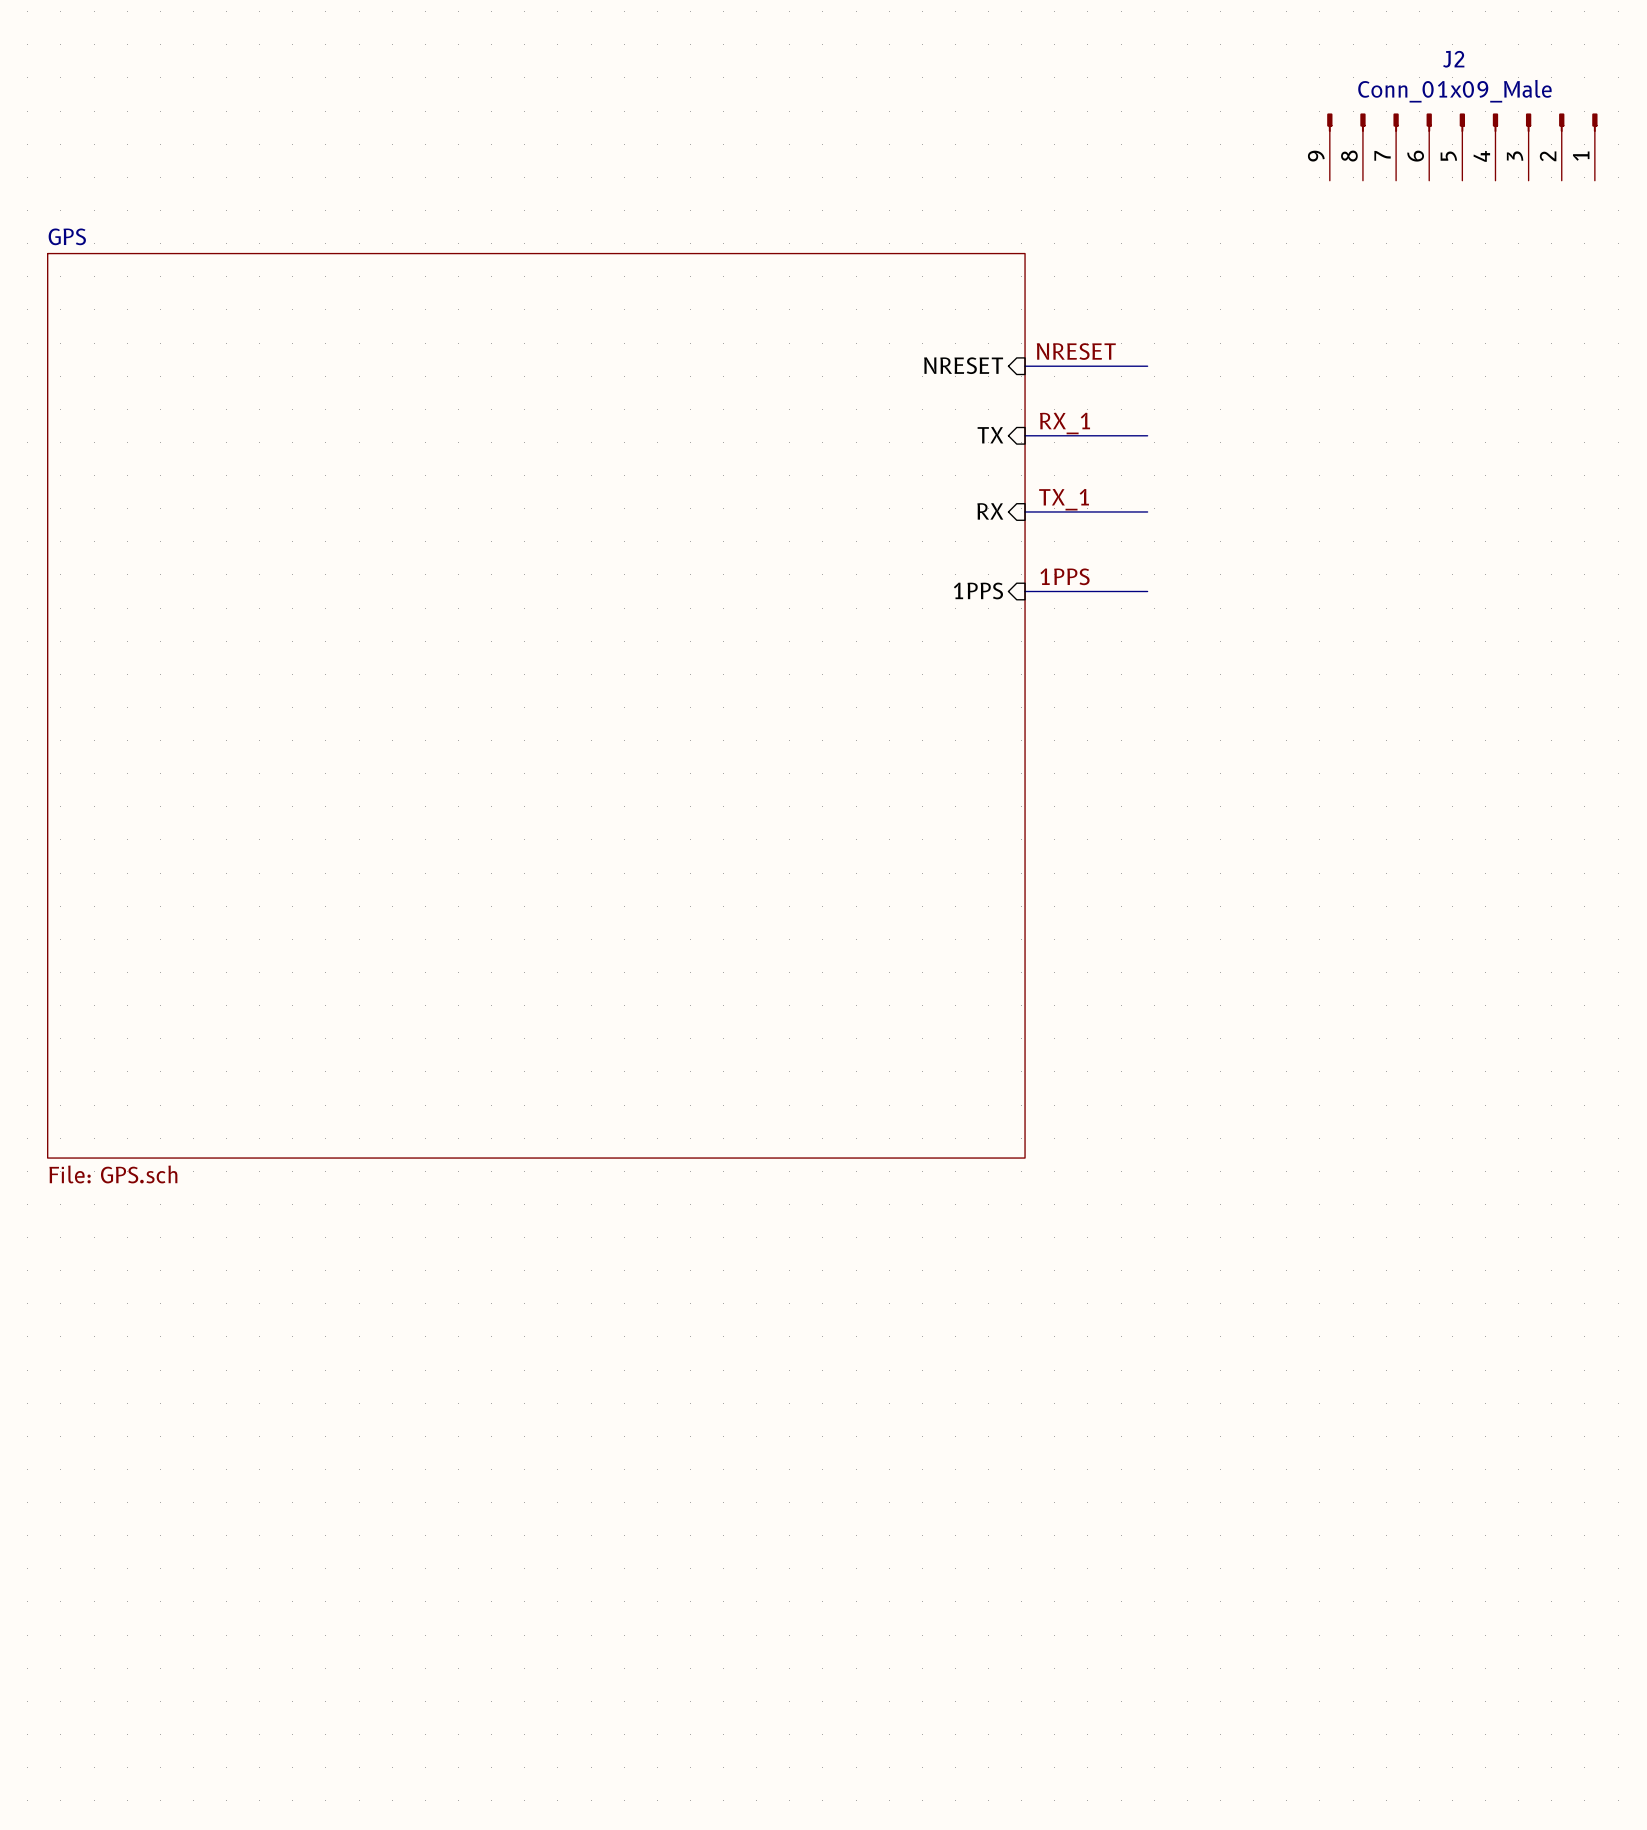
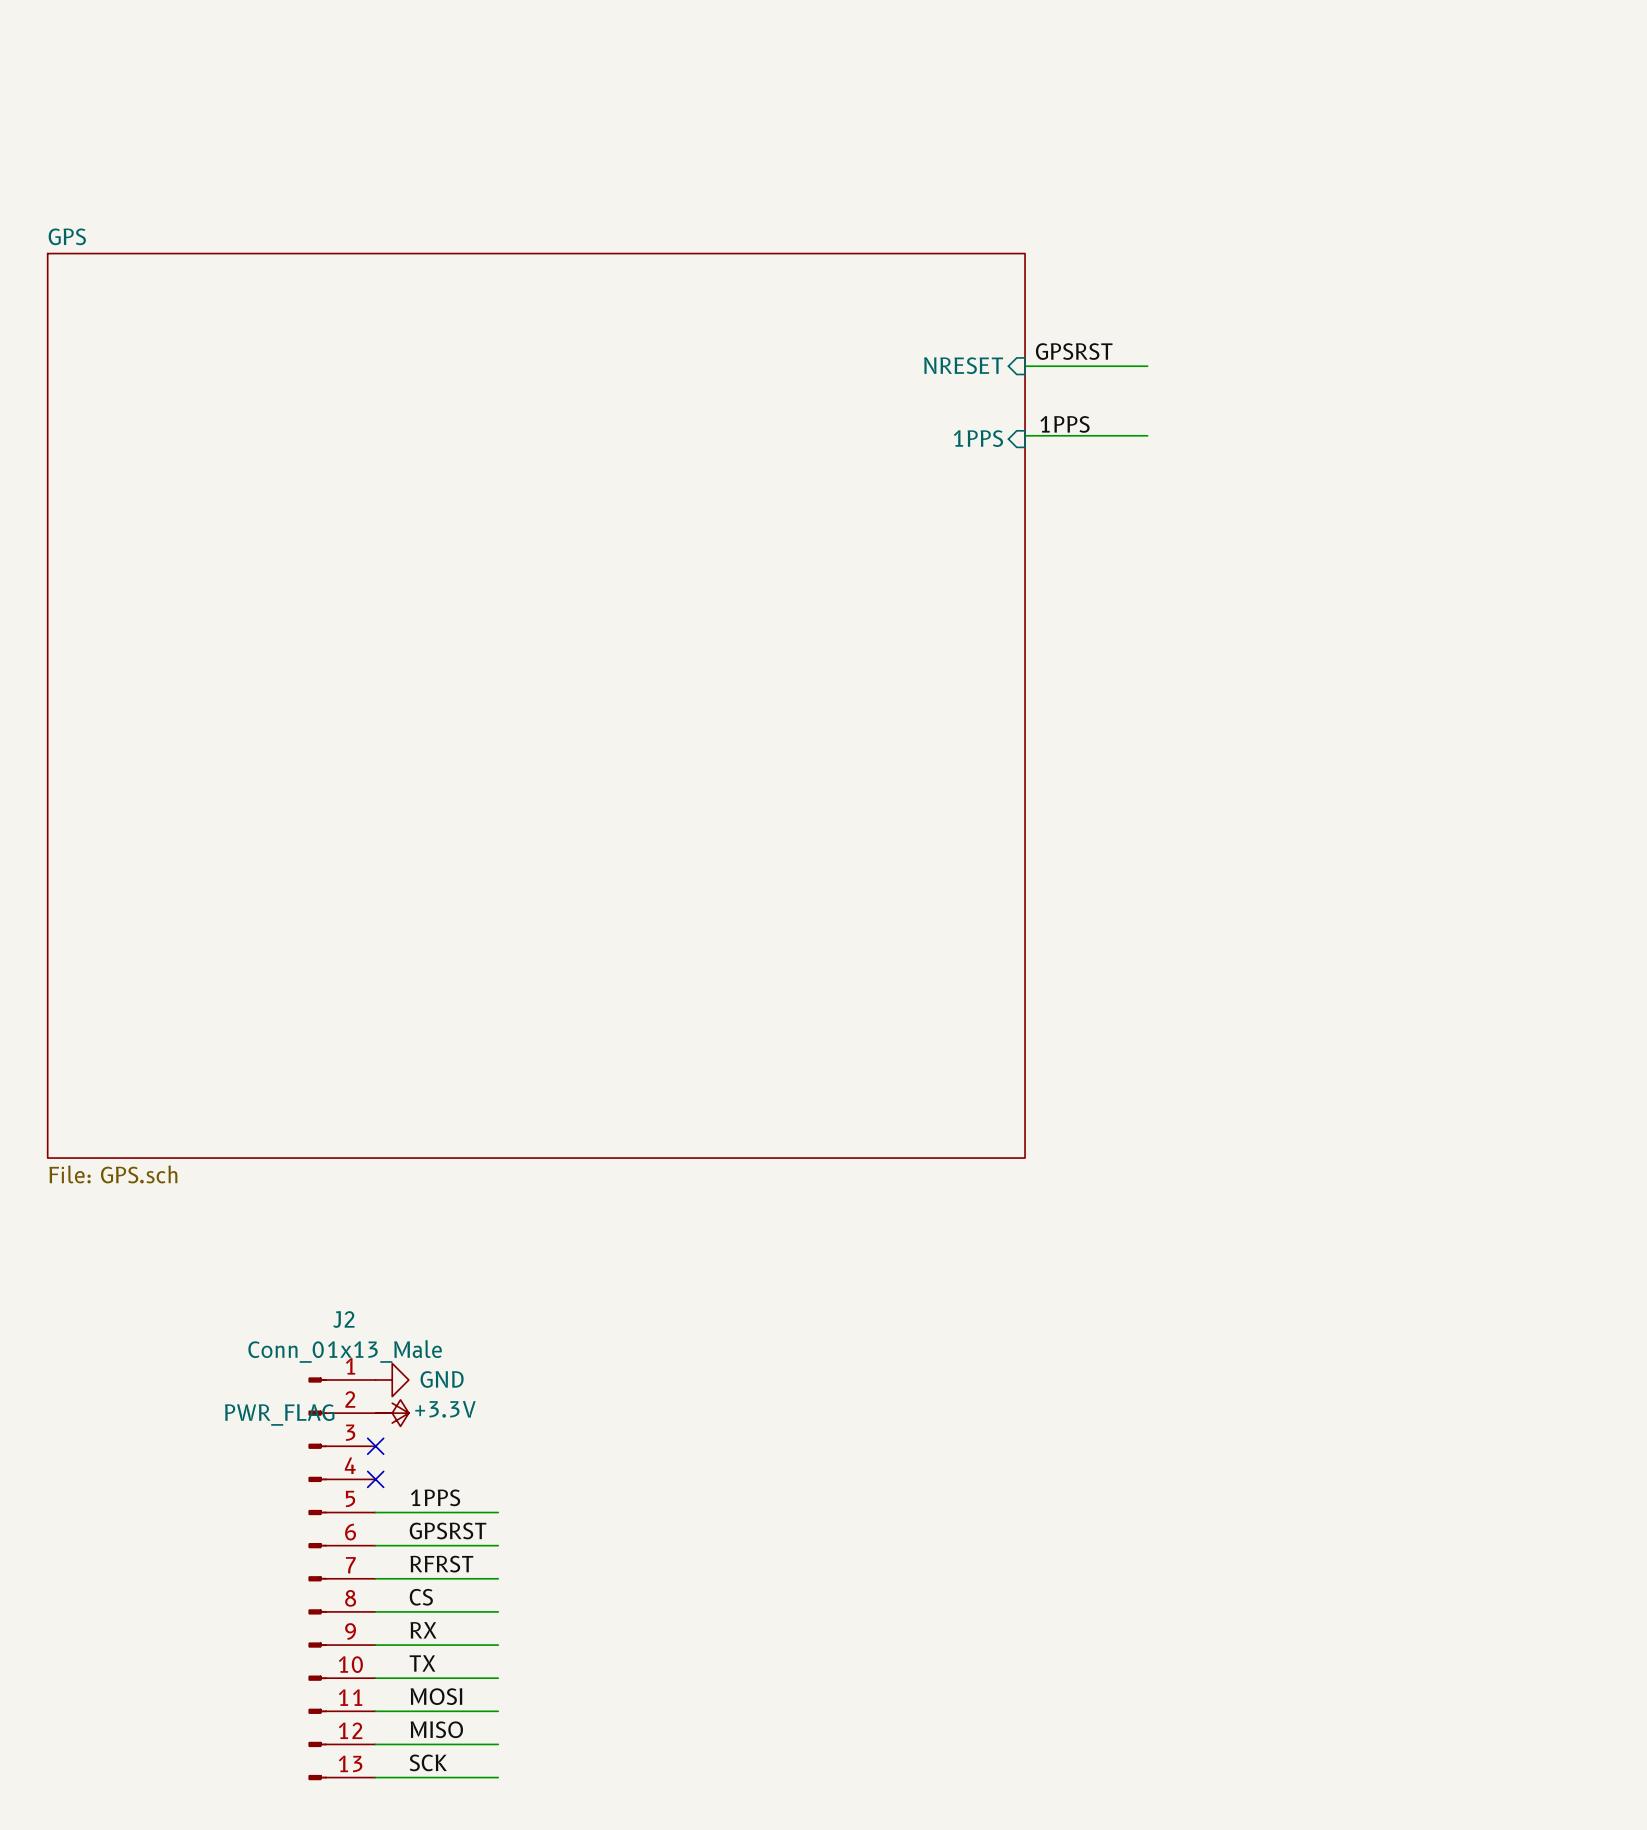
J2 name position: J2 (1453, 59) -> J2 (343, 1319)
J2 value: Conn_01x09_Male (1454, 91) -> Conn_01x13_Male (345, 1351)
J2 symbol: [1327, 113, 1598, 181] -> [308, 1377, 376, 1781]
label: NRESET (1076, 351) -> GPSRST (1074, 351)
label: RX_1 (1065, 423) -> none
sheet pin: TX (990, 435) -> none
label: TX_1 (1064, 499) -> none
sheet pin: RX (990, 511) -> none
wire: (1025, 511) (1147, 511) -> none
label position: 1PPS (1065, 576) -> 1PPS (1065, 424)
sheet pin position: 1PPS (978, 590) -> 1PPS (978, 438)
wire: (1025, 591) (1147, 591) -> none
power symbol: none -> GND (392, 1380)
power symbol: none -> +3.3V (392, 1413)
power symbol: none -> PWR_FLAG (392, 1413)
no-connect mark: none -> (375, 1446)
no-connect mark: none -> (375, 1479)
label: none -> 1PPS (435, 1497)
wire: none -> (375, 1512) (498, 1512)
label: none -> GPSRST (448, 1530)
wire: none -> (375, 1545) (498, 1545)
label: none -> RFRST (441, 1564)
wire: none -> (375, 1578) (498, 1578)
label: none -> CS (421, 1597)
wire: none -> (375, 1611) (498, 1611)
label: none -> RX (423, 1630)
wire: none -> (375, 1645) (498, 1645)
label: none -> TX (422, 1663)
wire: none -> (375, 1678) (498, 1678)
label: none -> MOSI (436, 1696)
wire: none -> (375, 1711) (498, 1711)
label: none -> MISO (436, 1729)
wire: none -> (375, 1744) (498, 1744)
label: none -> SCK (428, 1762)
wire: none -> (375, 1777) (498, 1777)

